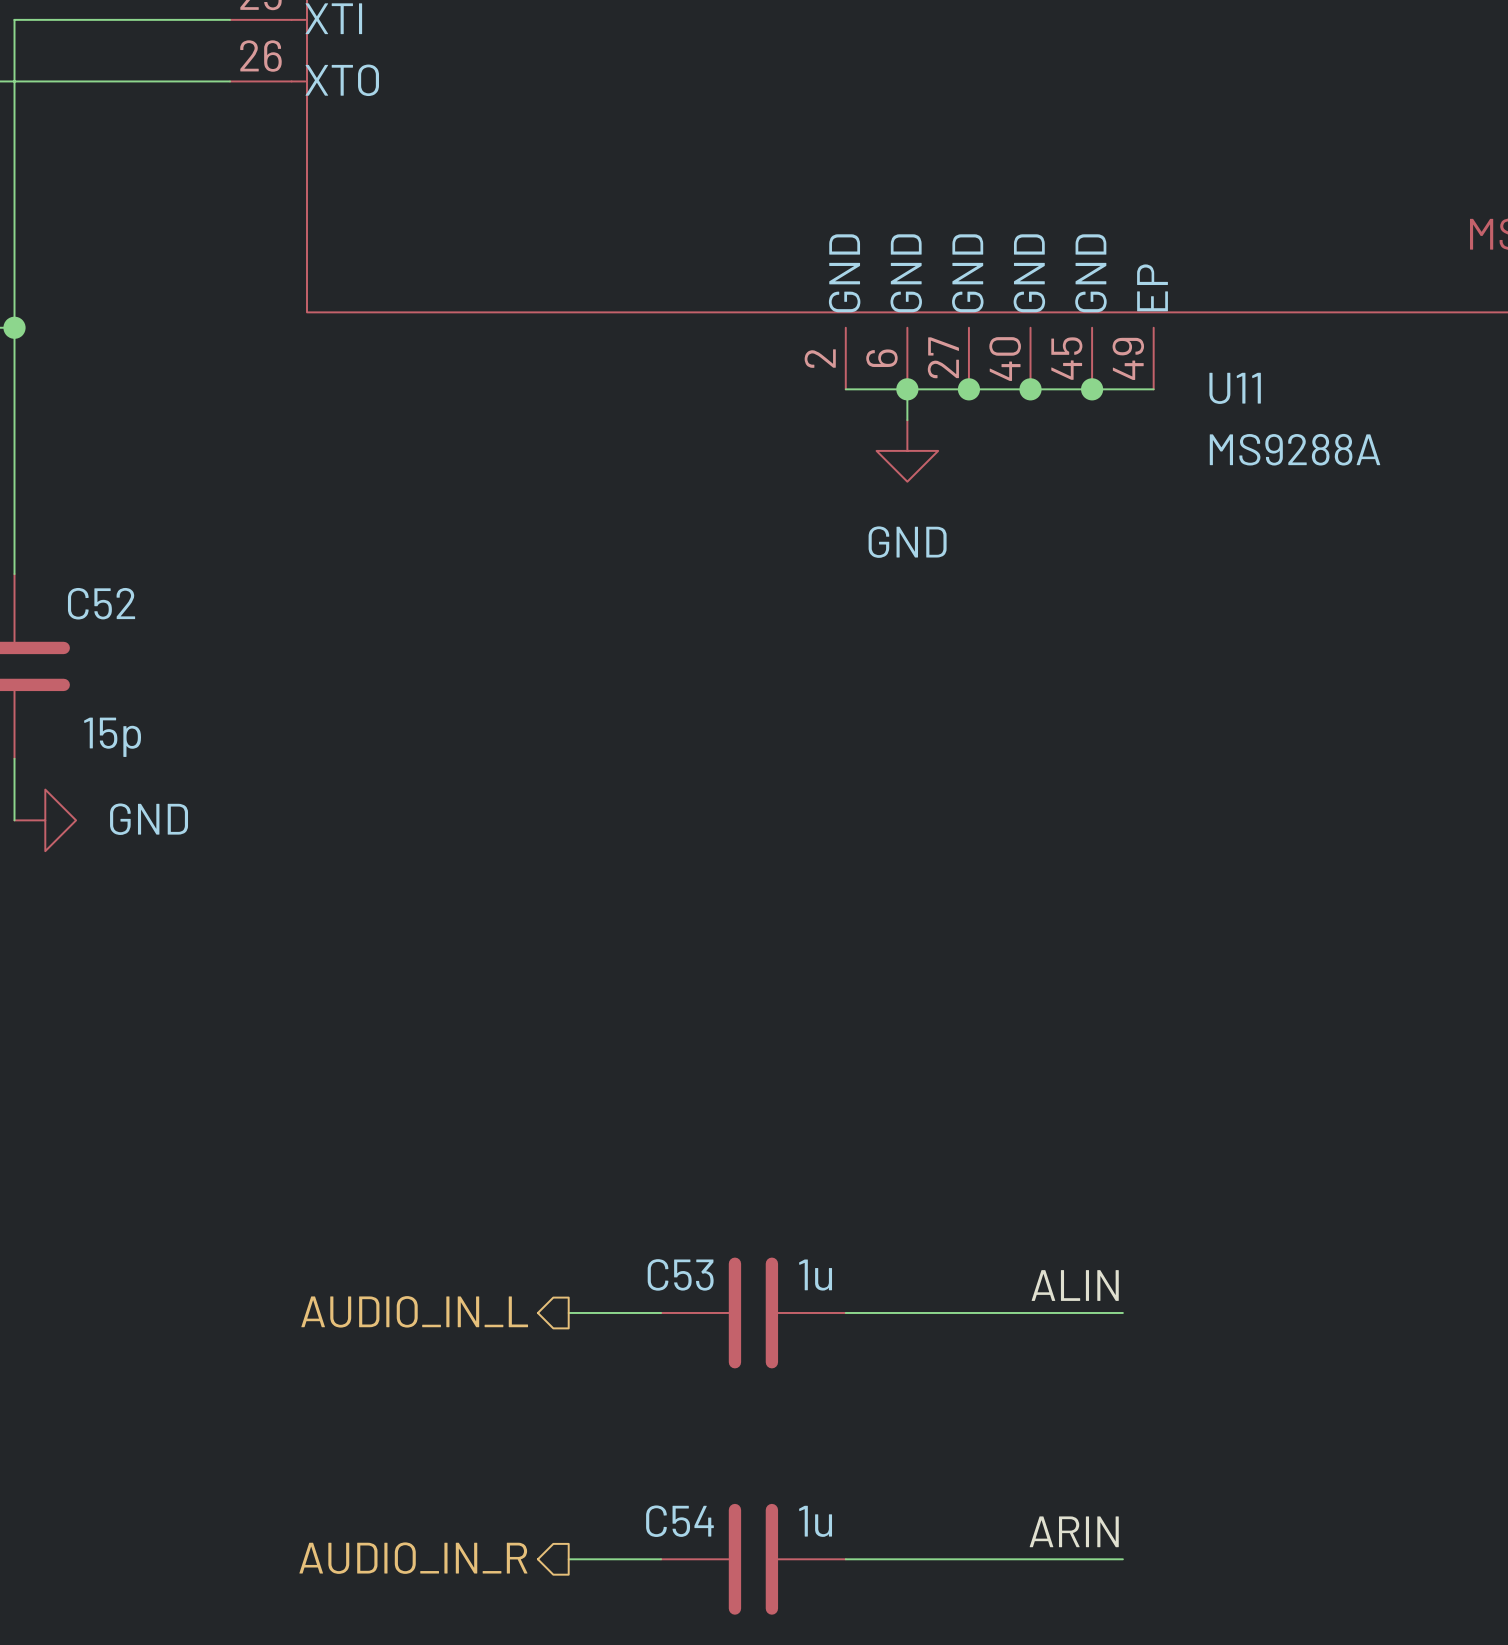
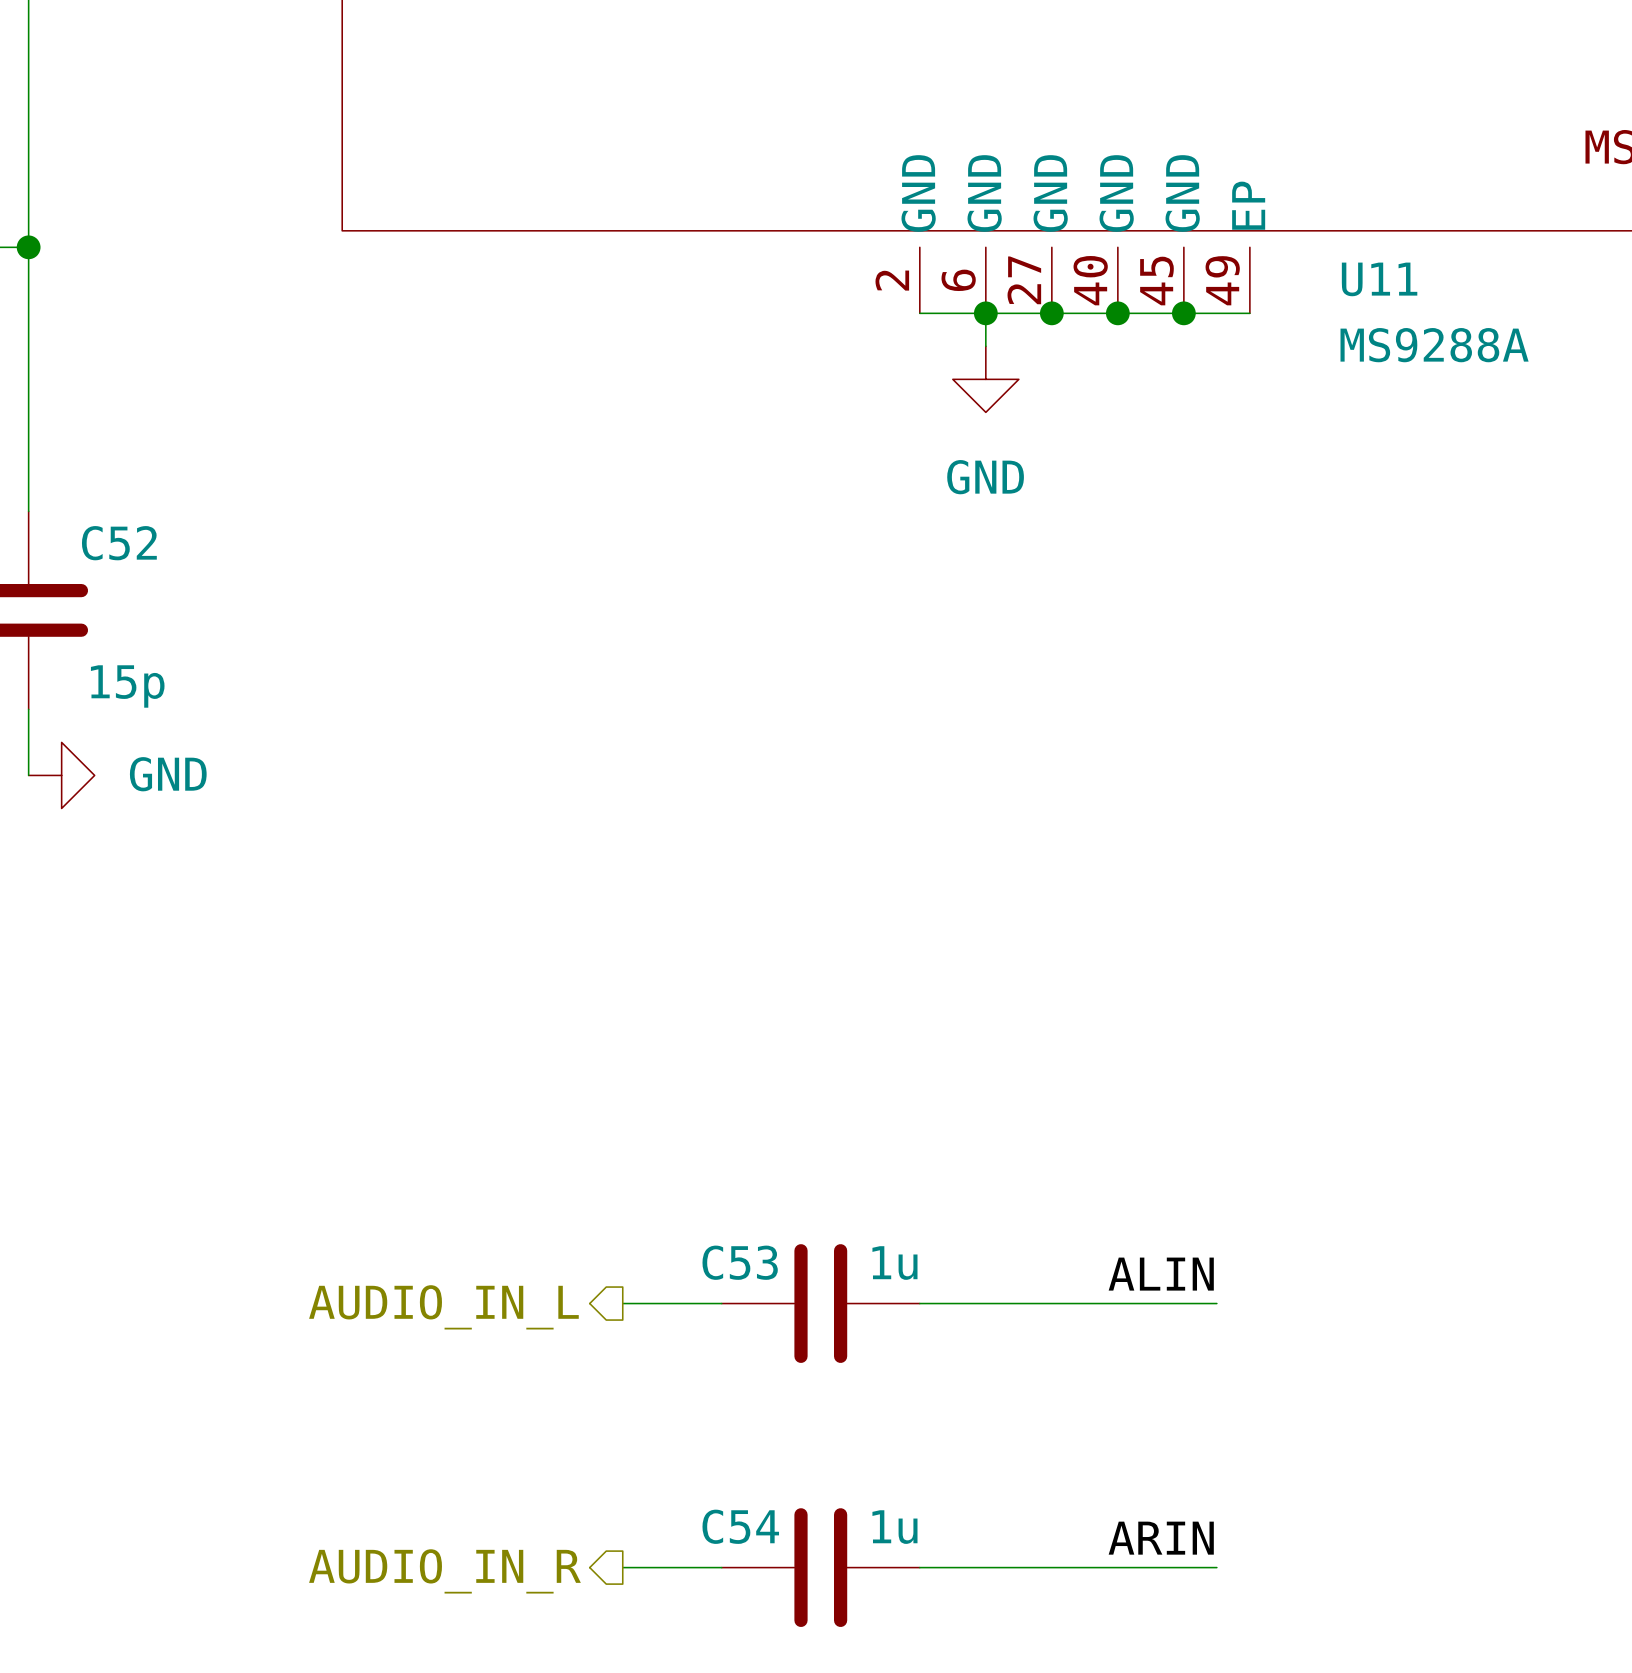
U11 name position: U11 (1235, 388) -> U11 (1379, 279)
U11 value position: MS9288A (1295, 449) -> MS9288A (1434, 345)

